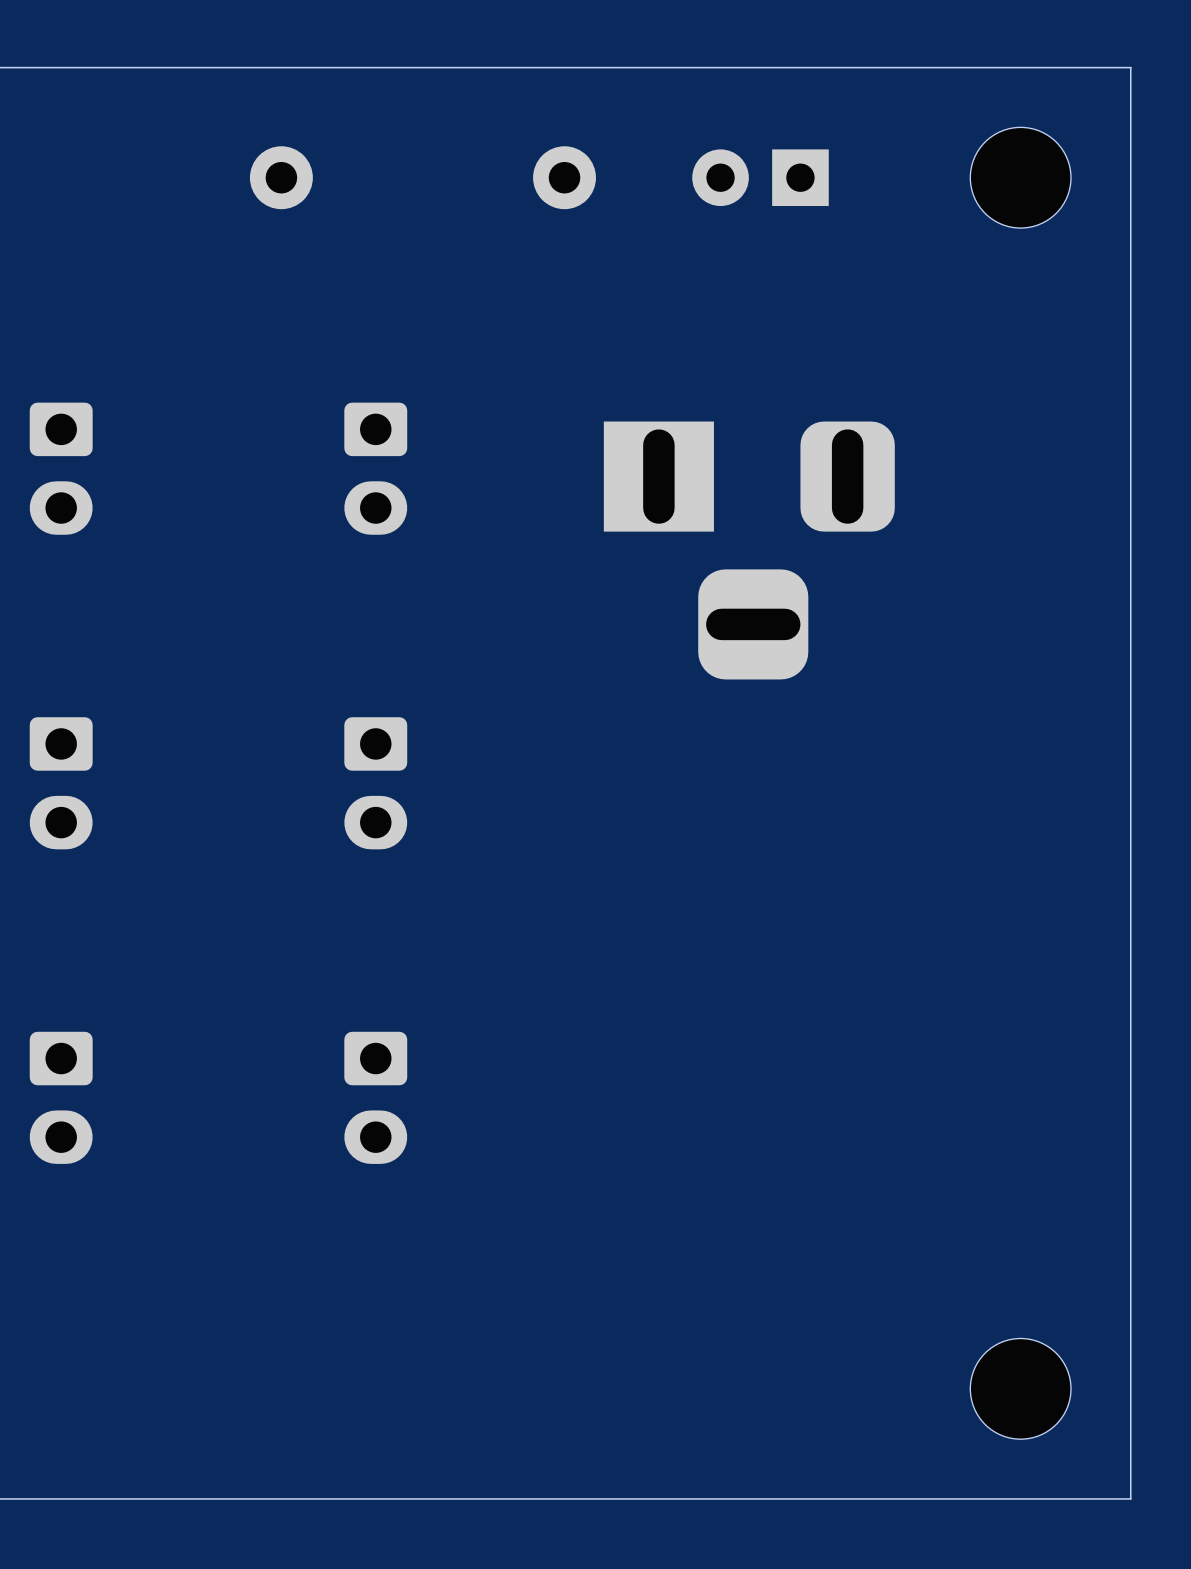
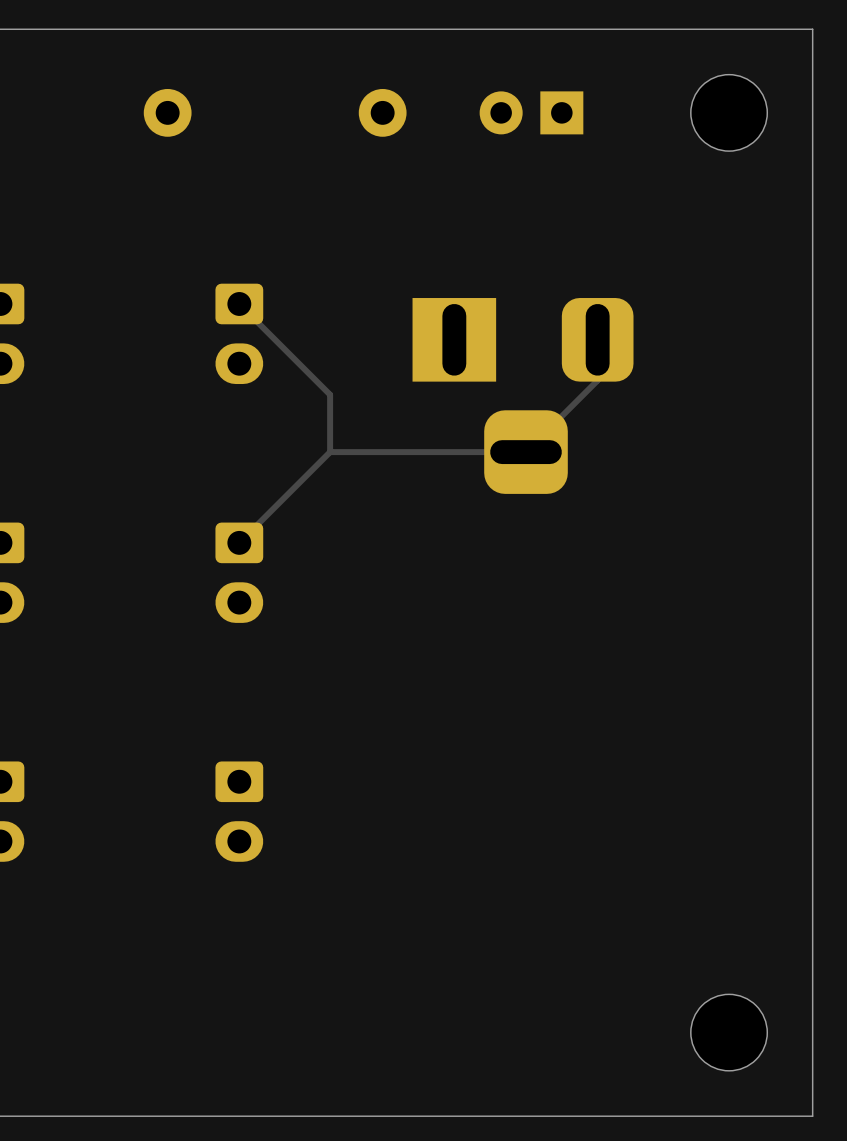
track: none -> (239, 303) (330, 394) (330, 452)
track: none -> (597, 339) (597, 380) (526, 452) (330, 452)
track: none -> (330, 452) (239, 542)

